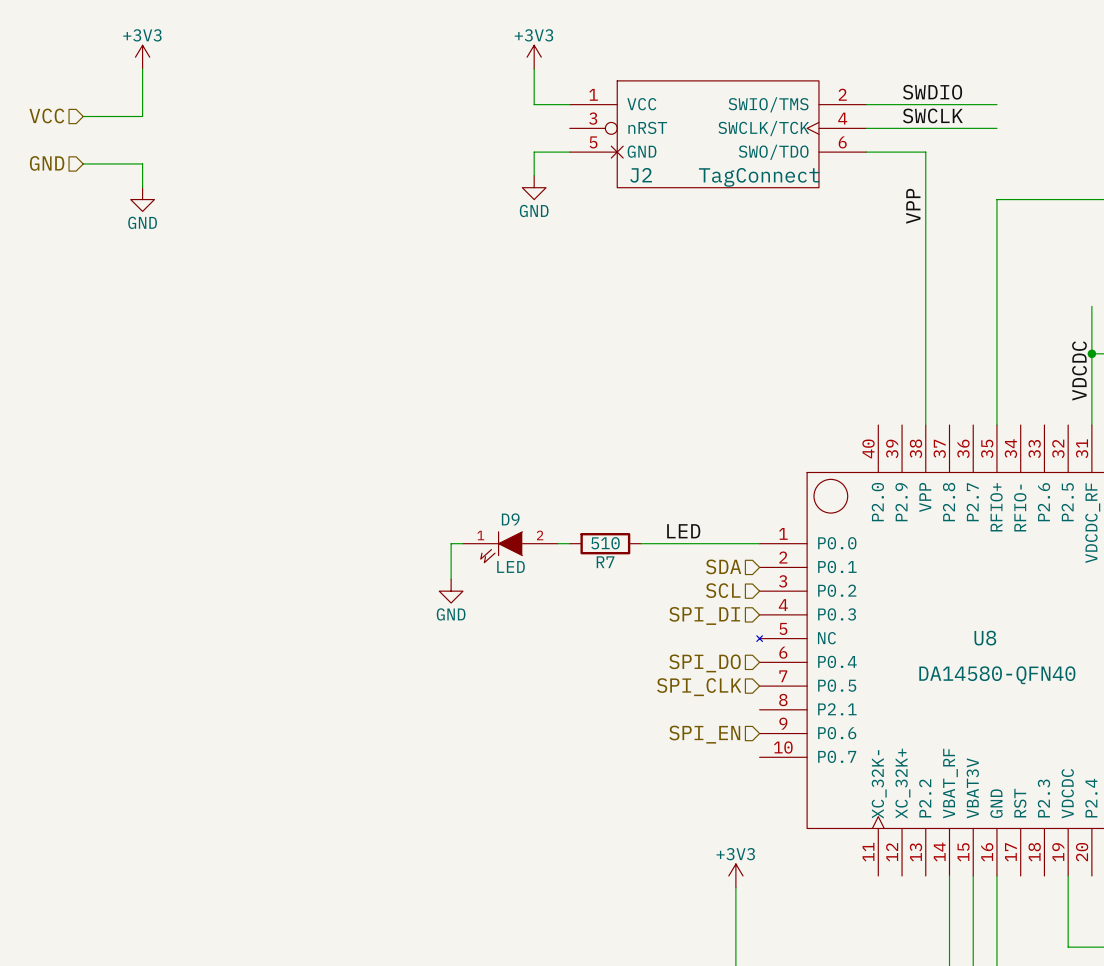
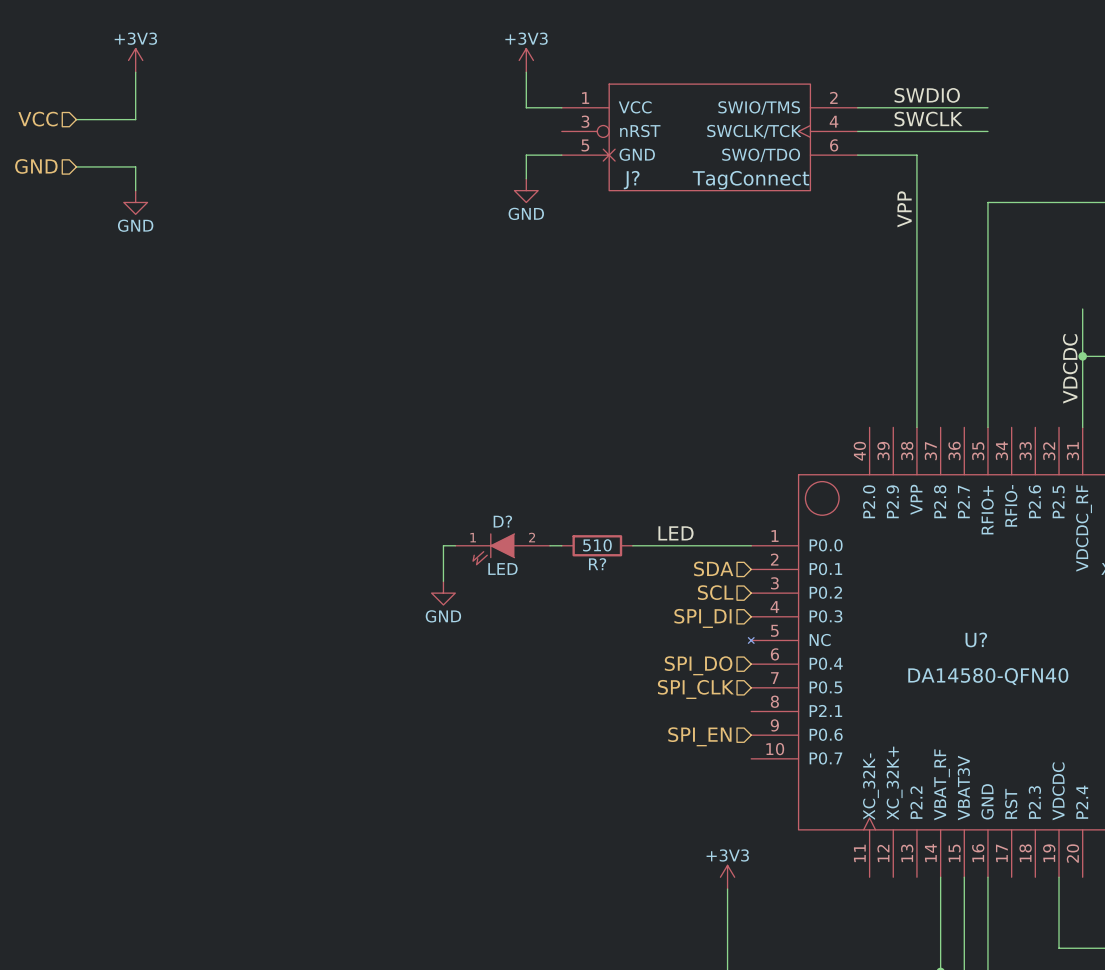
J2 name: J2 (641, 175) -> J? (631, 180)
D9 name: D9 (510, 519) -> D? (502, 521)
R7 name: R7 (605, 562) -> R? (597, 564)
U8 name: U8 (985, 638) -> U? (976, 639)

